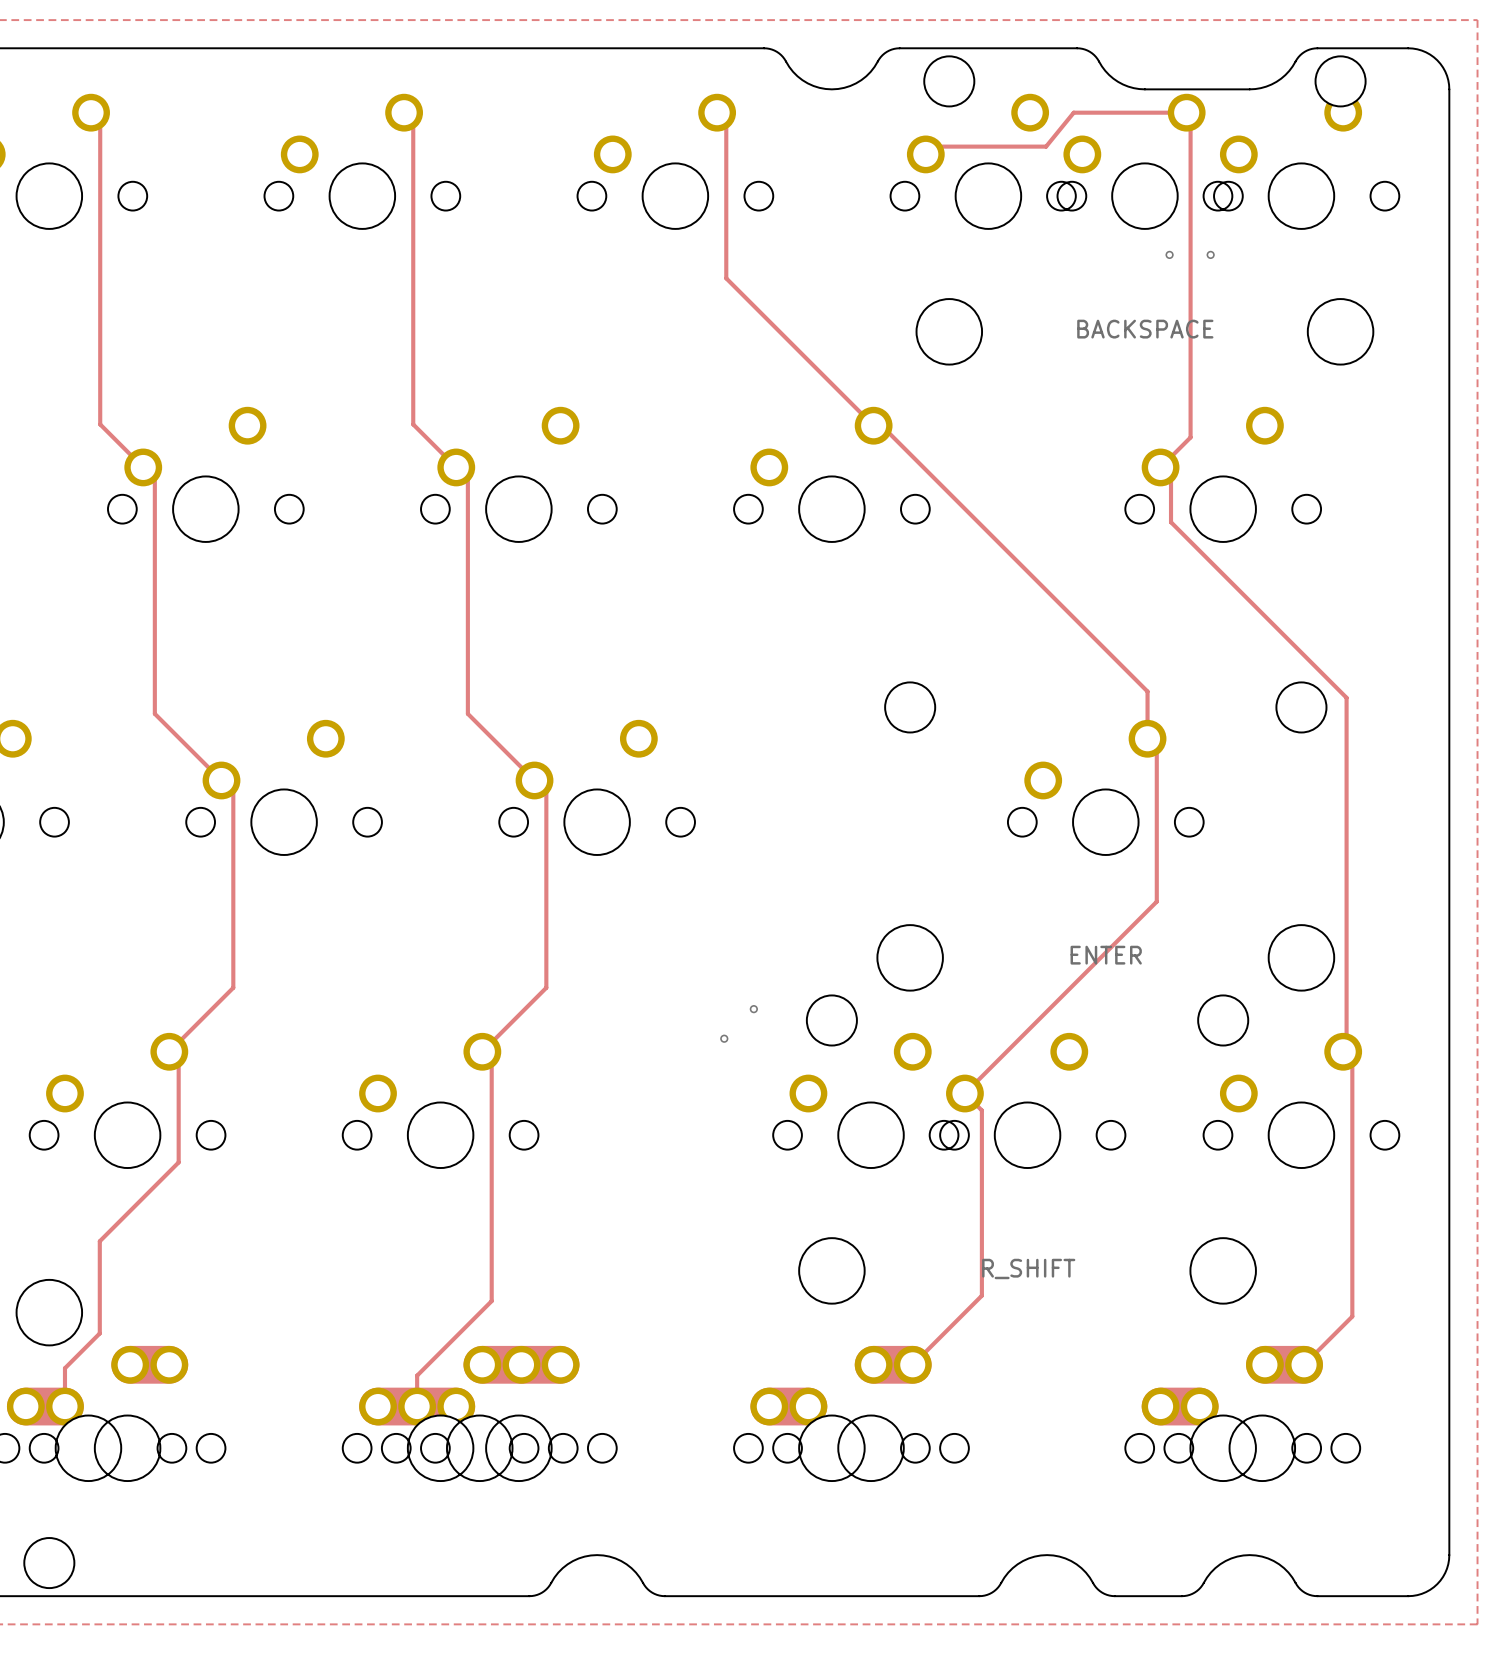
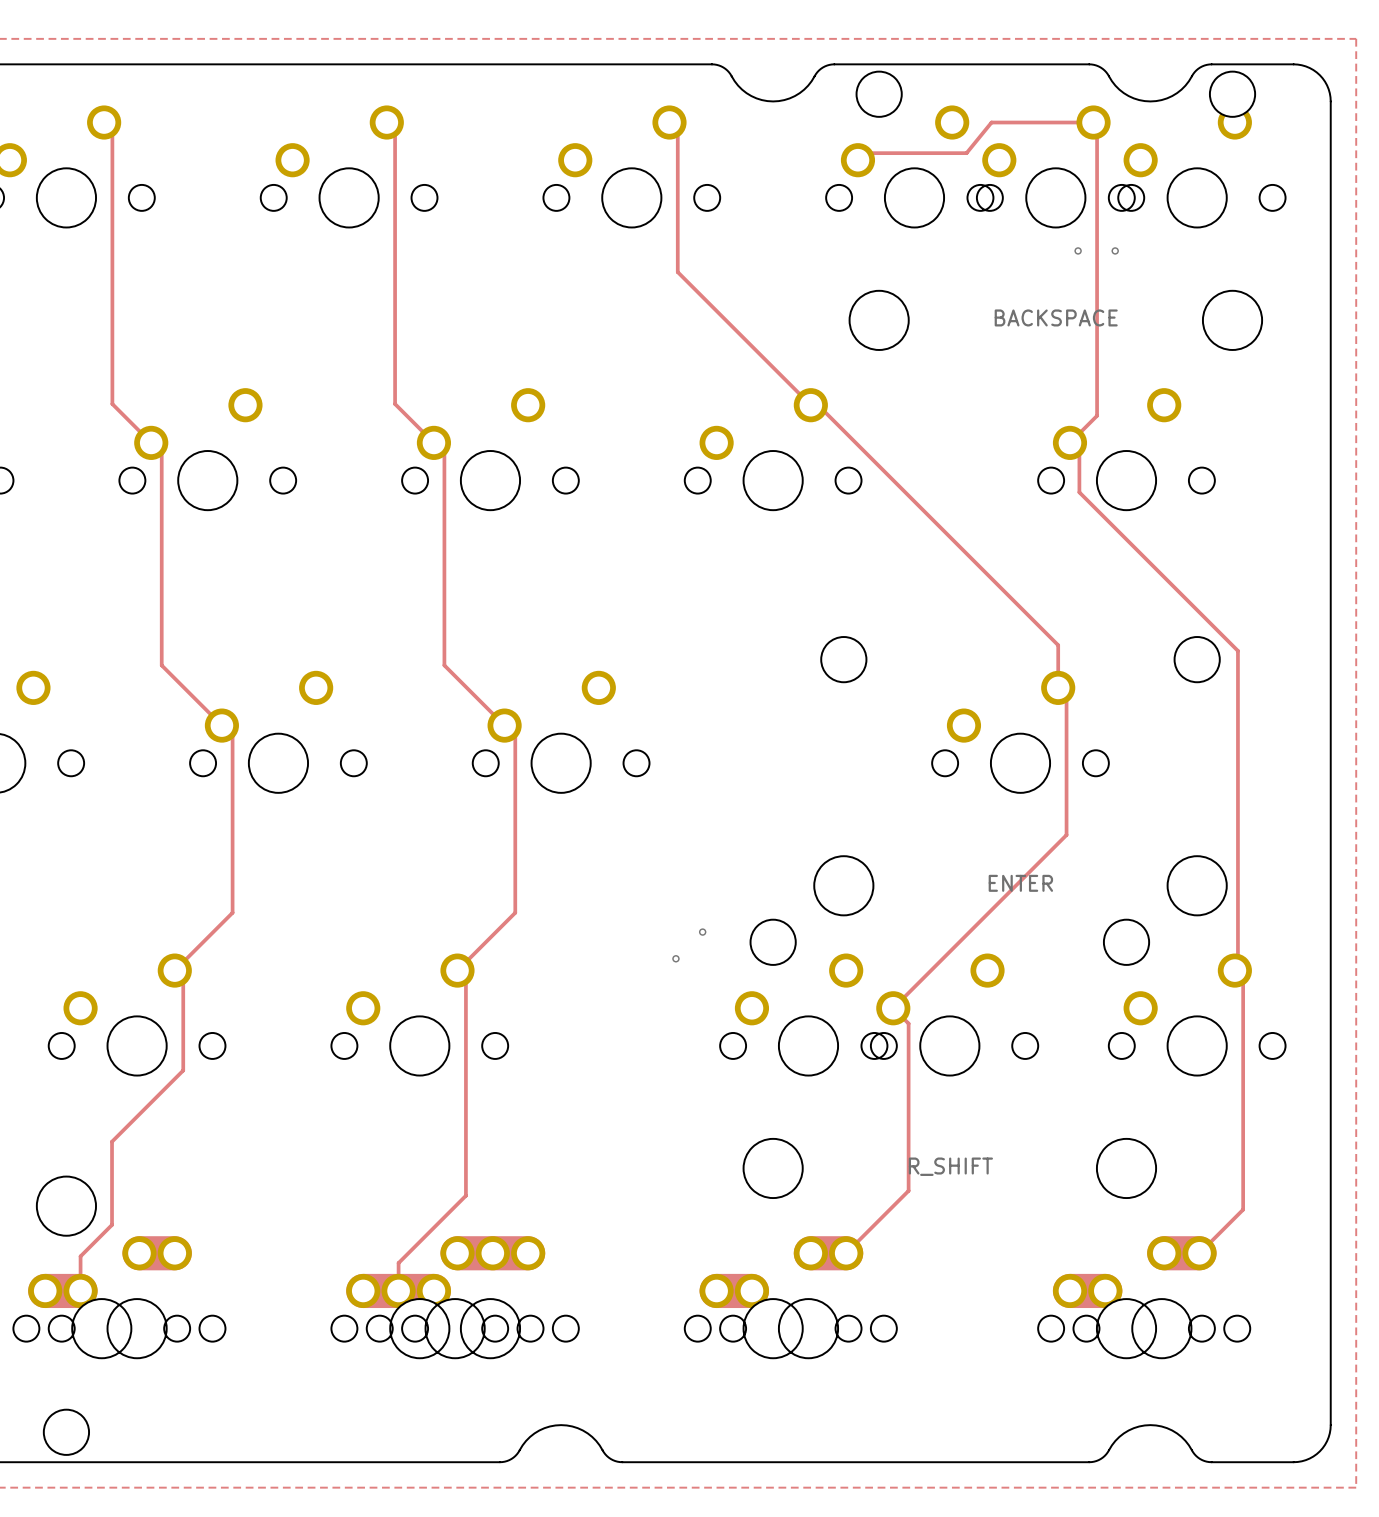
board edge: (1077, 48) (1092, 53) (1105, 70) (1118, 81) (1133, 88) (1144, 89) -> none
board edge: (1295, 61) (1281, 78) (1260, 88) (1144, 89) -> (1191, 76) (1185, 85) (1172, 96) (1156, 101) (1144, 101) (1123, 93) (1115, 85) (1104, 70) (1094, 64) (994, 64)
board edge: (979, 1596) (994, 1591) (1008, 1572) (1023, 1561) (1034, 1556) (1047, 1555) (1059, 1556) (1071, 1561) (1085, 1572) (1099, 1591) (1114, 1596) -> (906, 1462) (1028, 1462)

